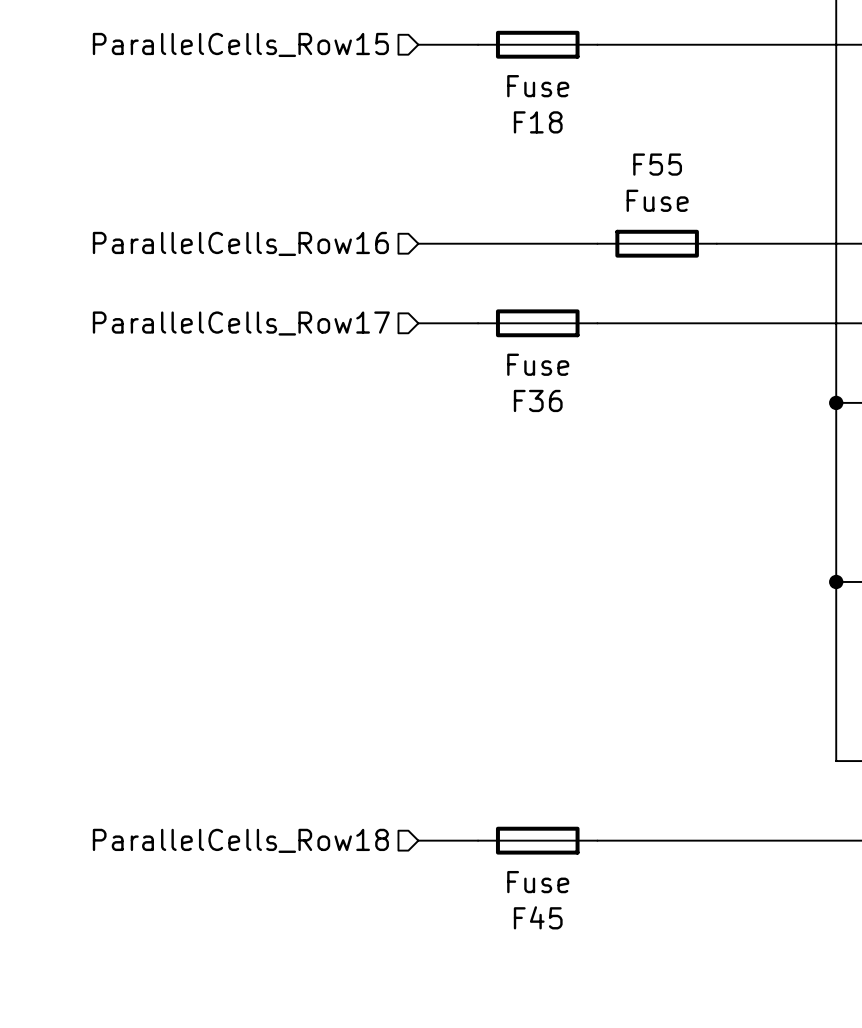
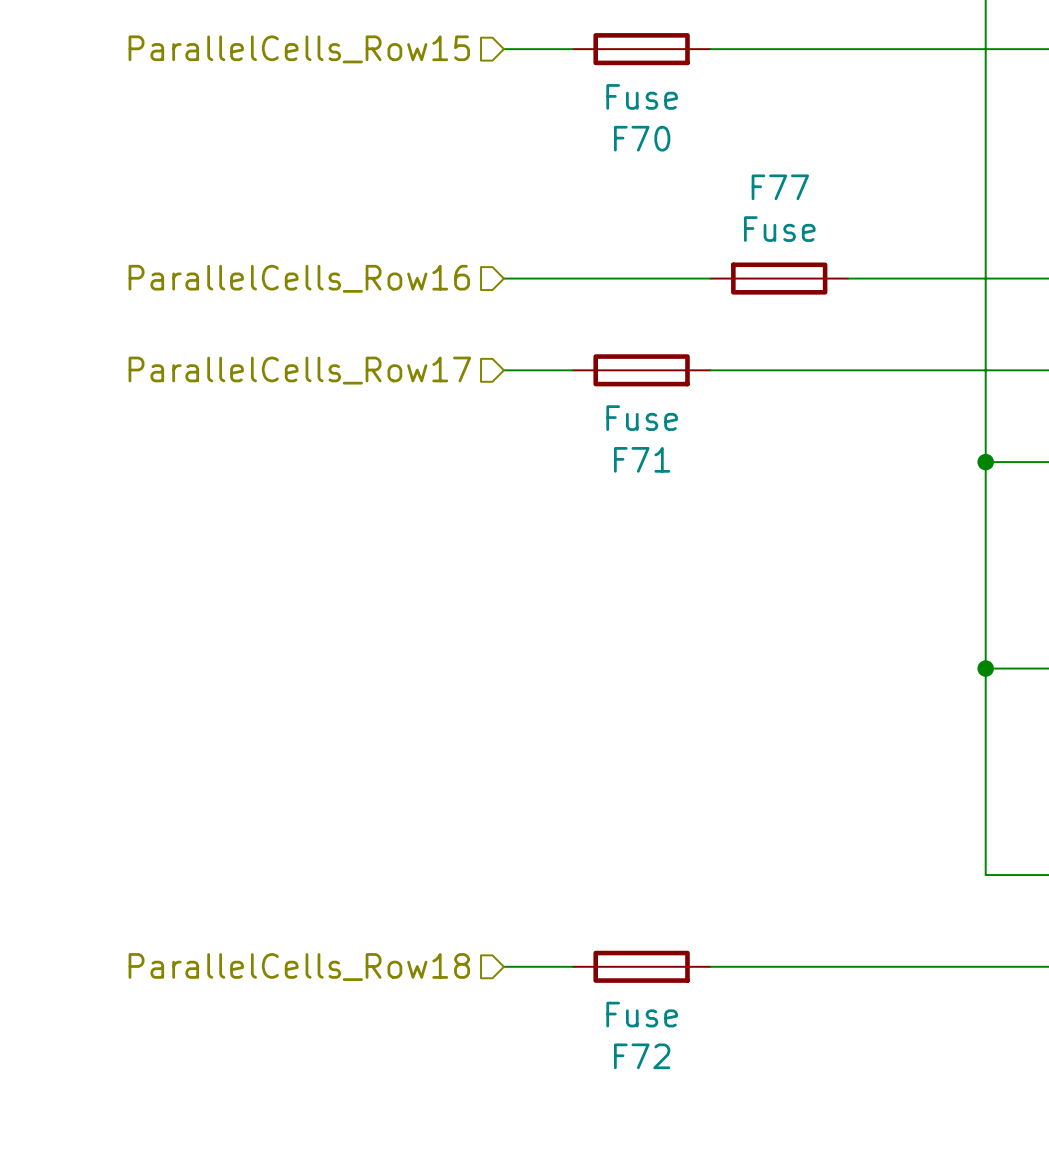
F18 name: F18 (538, 122) -> F70 (642, 138)
F55 name: F55 (657, 164) -> F77 (780, 187)
F36 name: F36 (538, 400) -> F71 (642, 459)
F45 name: F45 (538, 917) -> F72 (642, 1056)

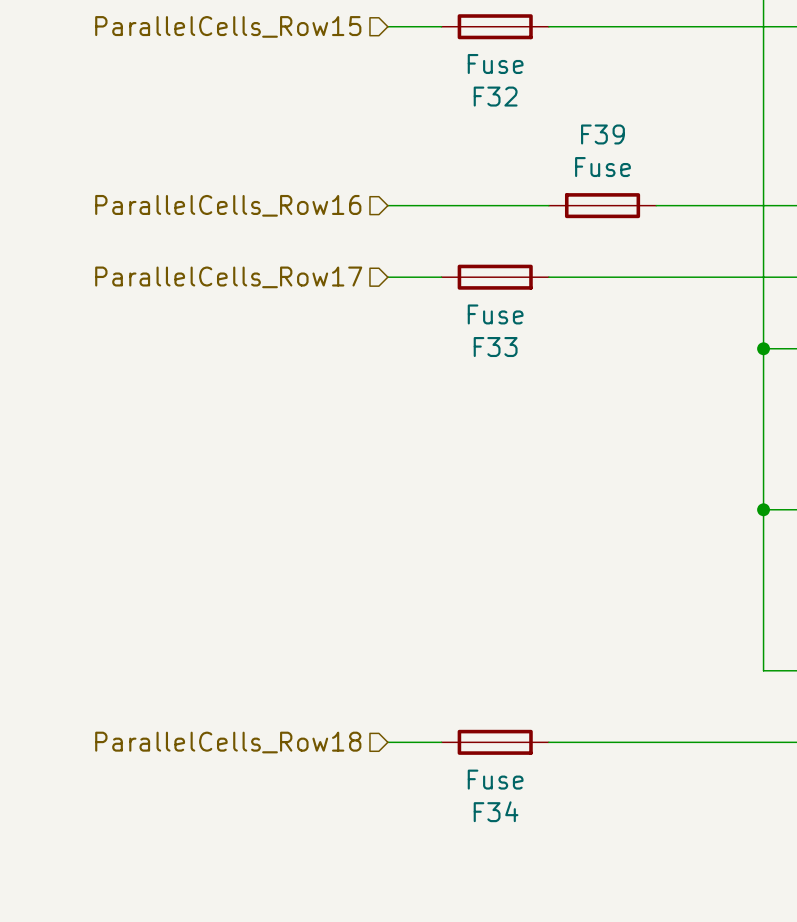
F70 name: F70 (642, 138) -> F32 (495, 96)
F77 name: F77 (780, 187) -> F39 (602, 134)
F71 name: F71 (642, 459) -> F33 (495, 347)
F72 name: F72 (642, 1056) -> F34 (496, 811)

